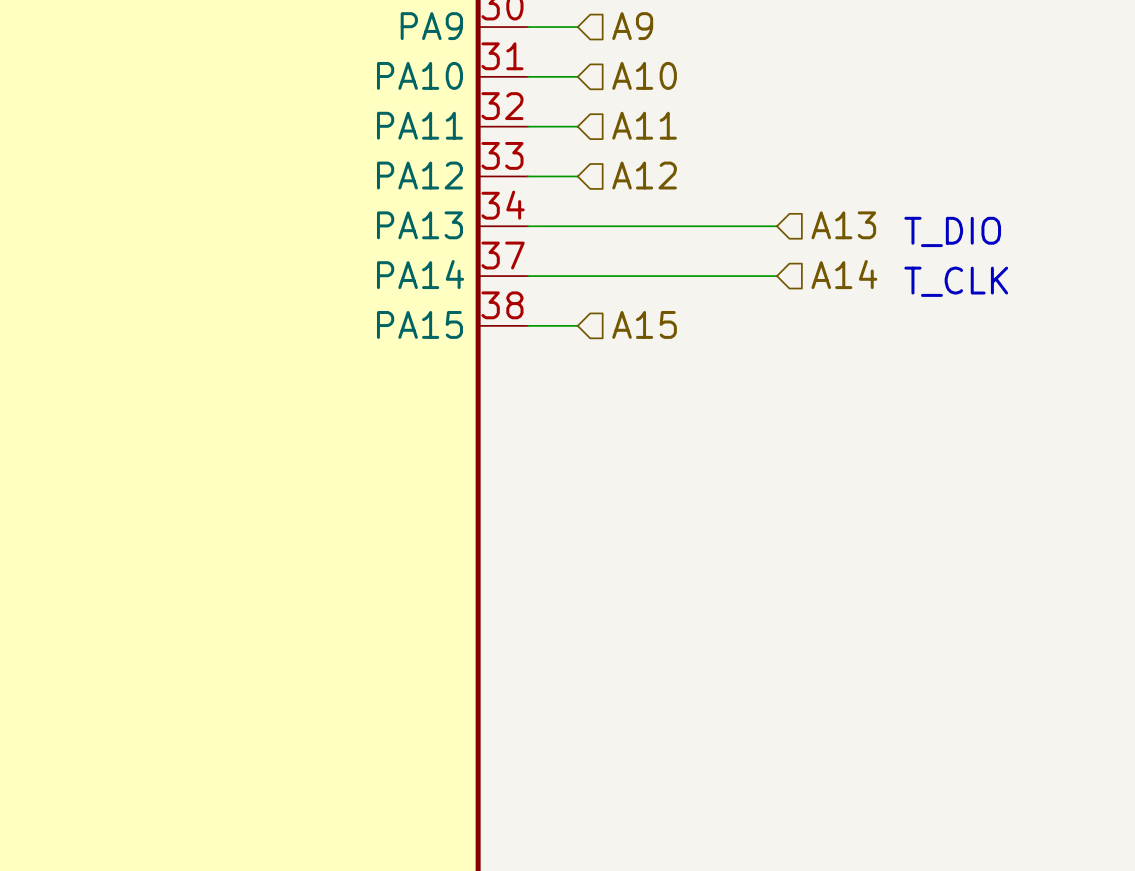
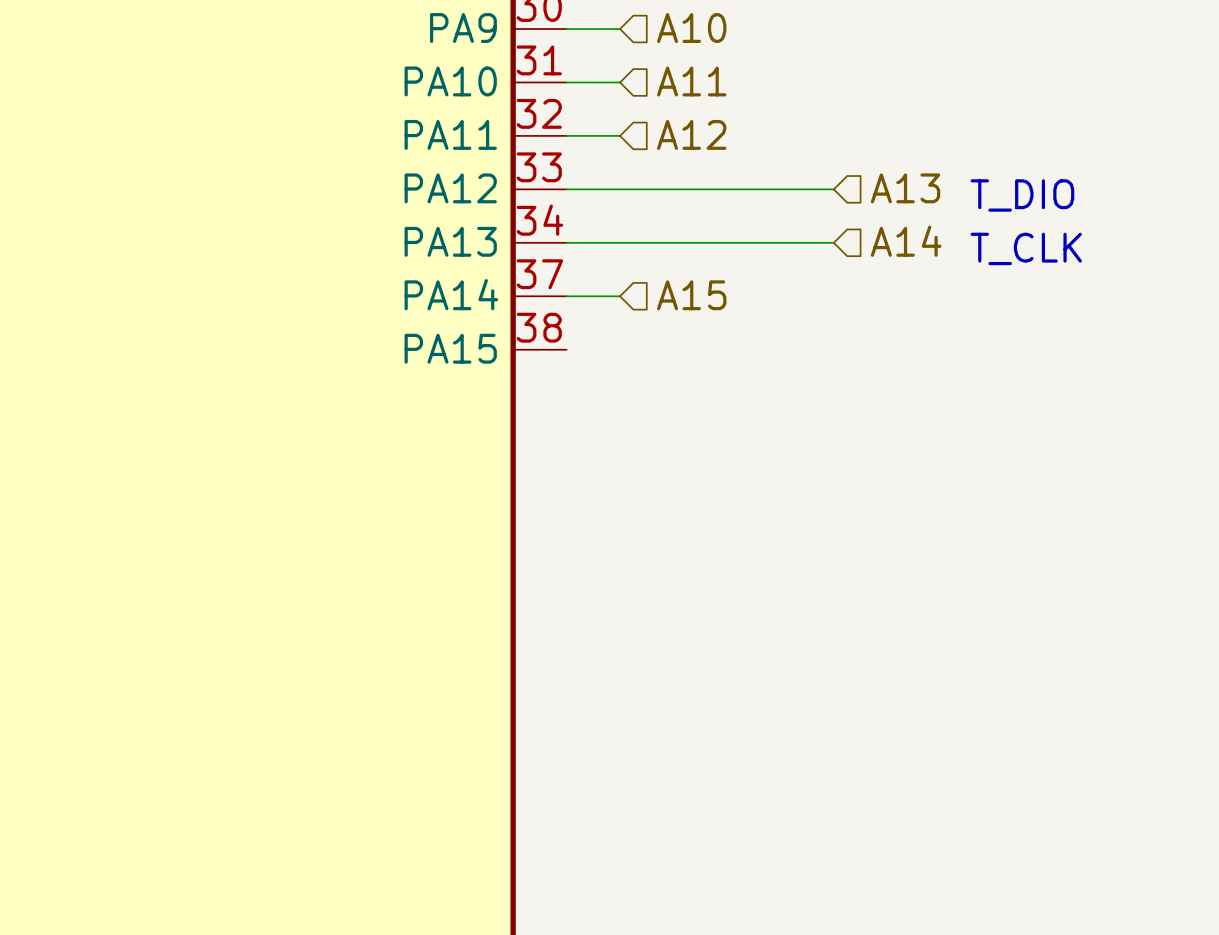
hierarchical label: A9 (632, 26) -> A10 (691, 28)
hierarchical label: A10 (644, 75) -> A11 (691, 81)
hierarchical label: A11 (644, 125) -> A12 (691, 134)
hierarchical label: A12 (644, 175) -> none
hierarchical label: none -> A13 (905, 188)
text: none -> T_DIO (1022, 195)
hierarchical label: A13 (843, 225) -> A14 (906, 241)
text: T_DIO (952, 231) -> T_CLK (1026, 248)
hierarchical label: A14 (844, 274) -> none
wire: (577, 276) (776, 276) -> (620, 189) (833, 189)
text: T_CLK (956, 281) -> none
hierarchical label position: A15 (644, 324) -> A15 (691, 295)
wire: (527, 325) (577, 325) -> none

